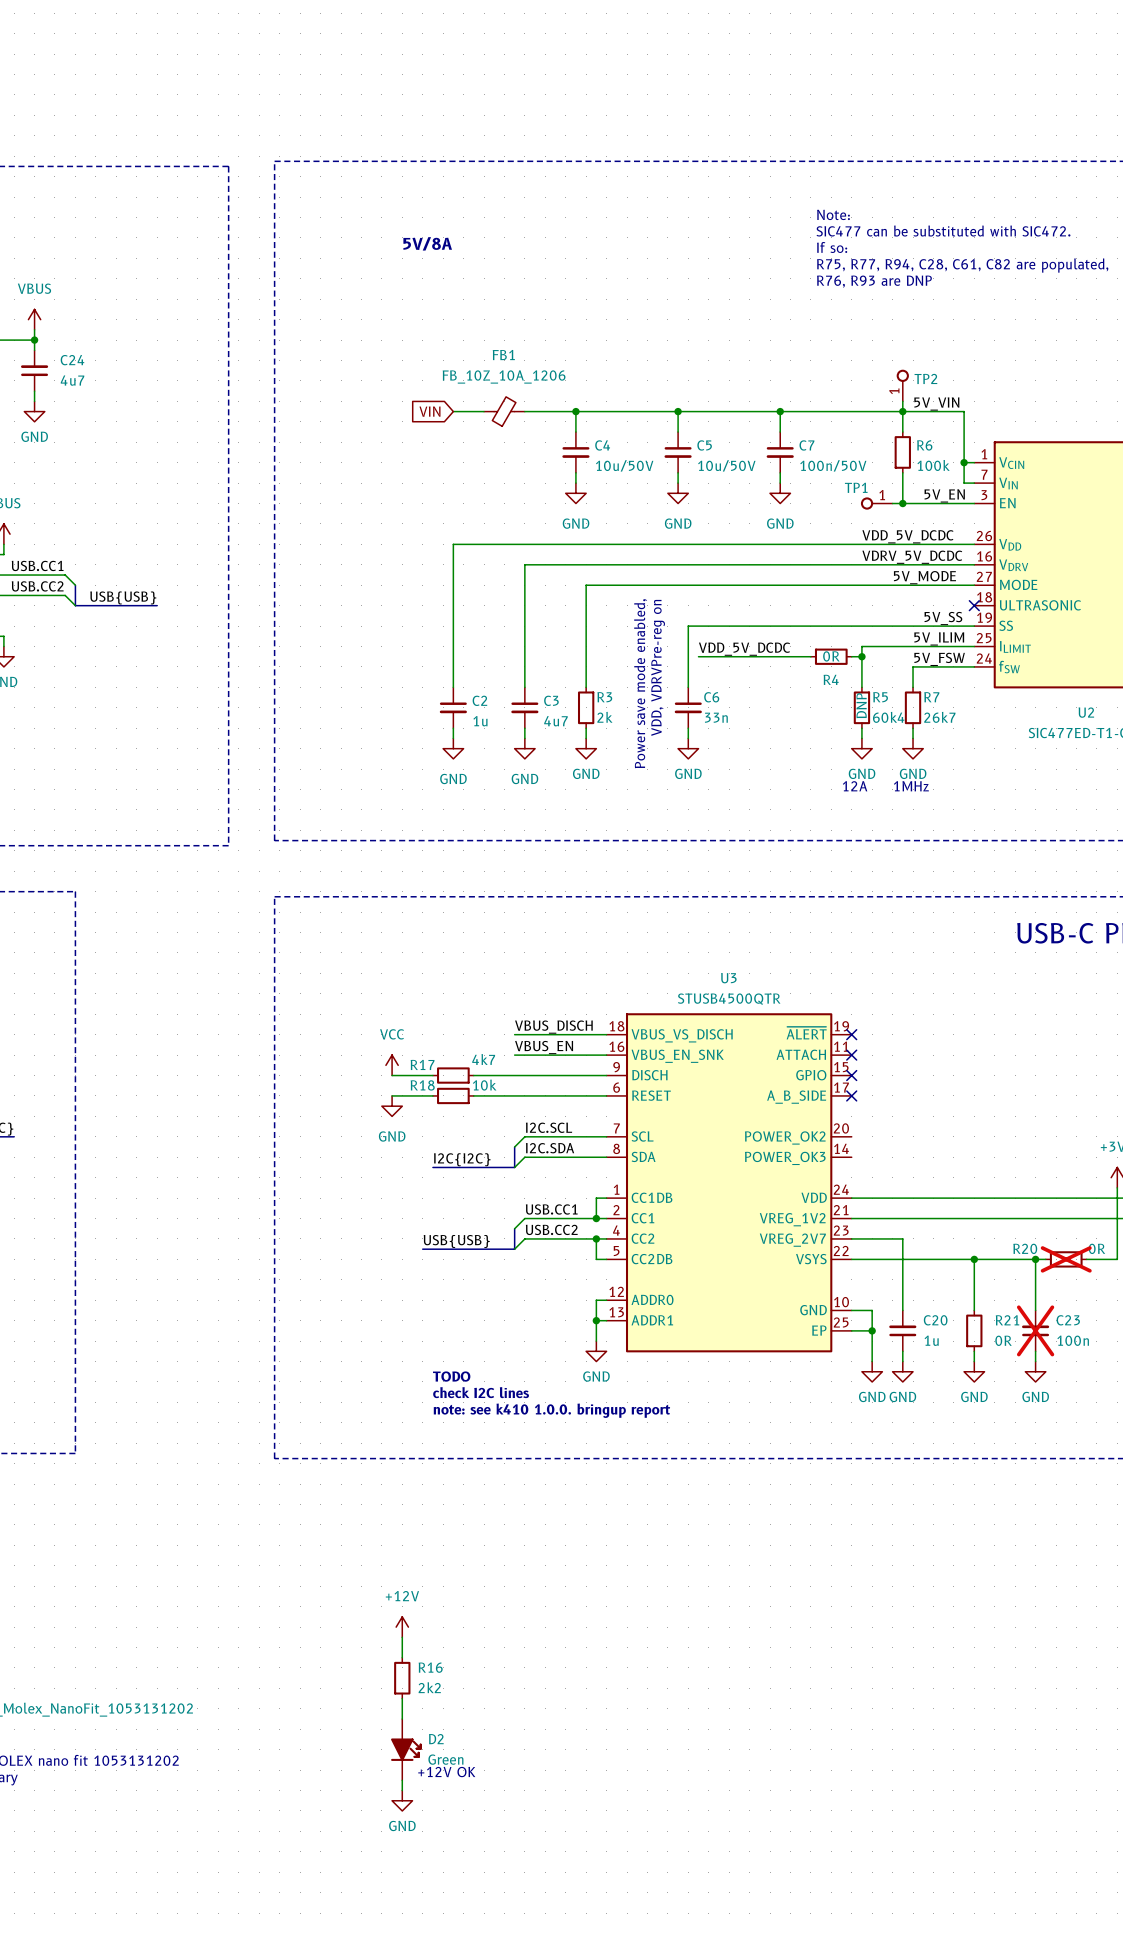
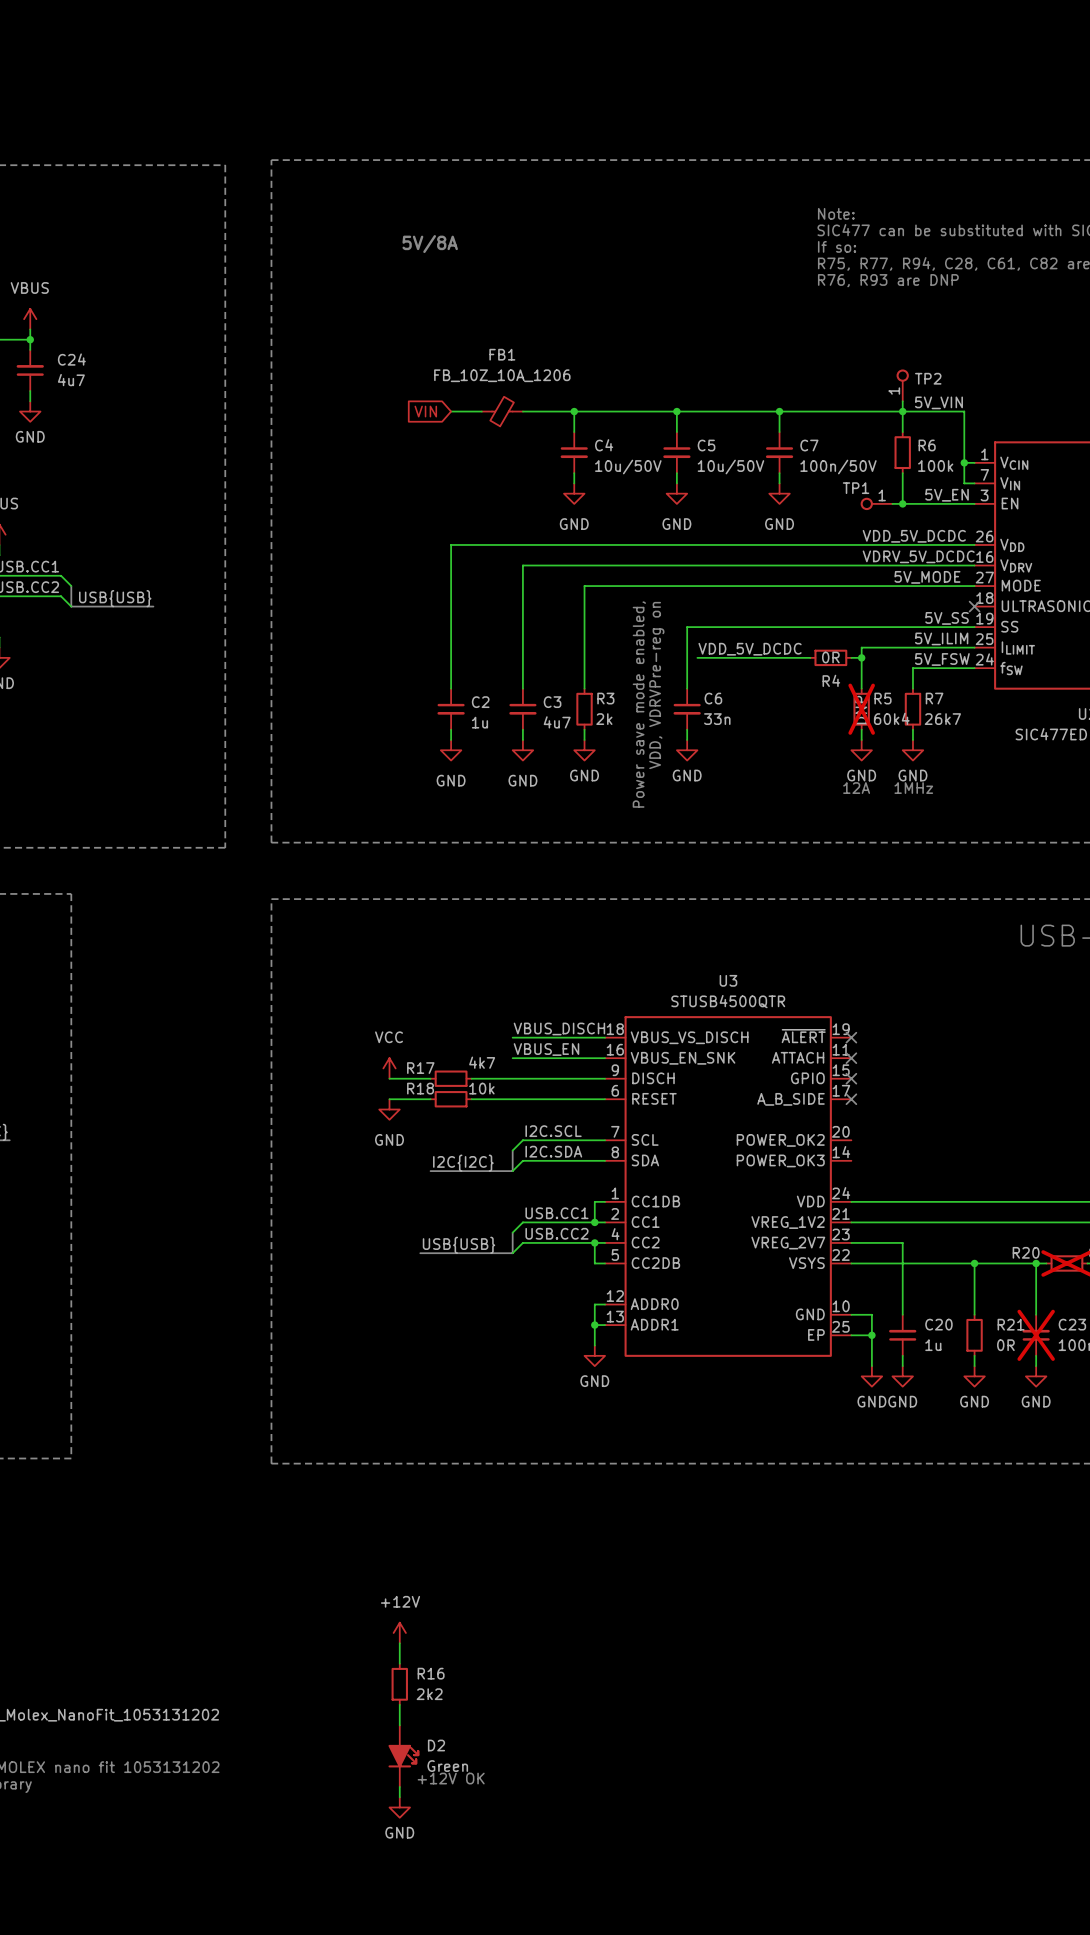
R5 do-not-place cross: none -> (861, 709)
text: TODO (451, 1376) -> none
text: check I2C lines (481, 1392) -> none
text: note: see k410 1.0.0. bringup report (551, 1410) -> none

